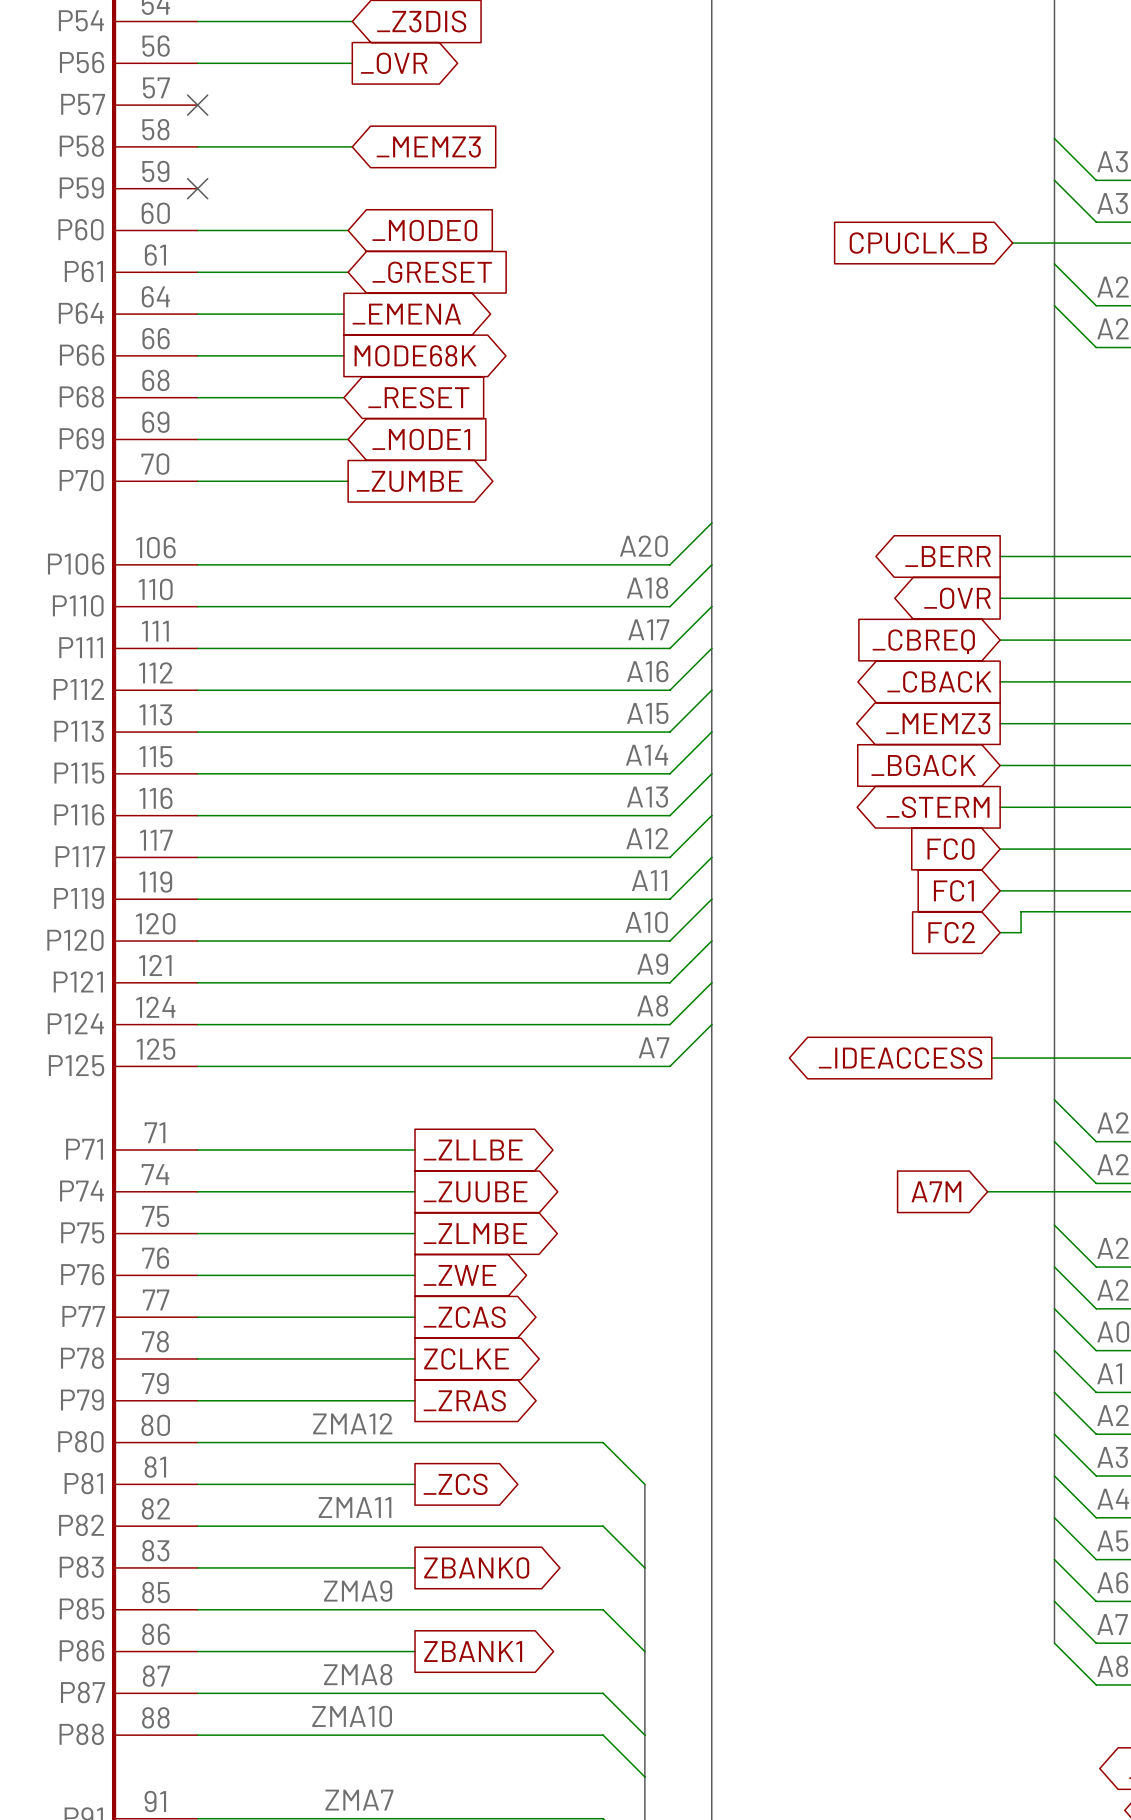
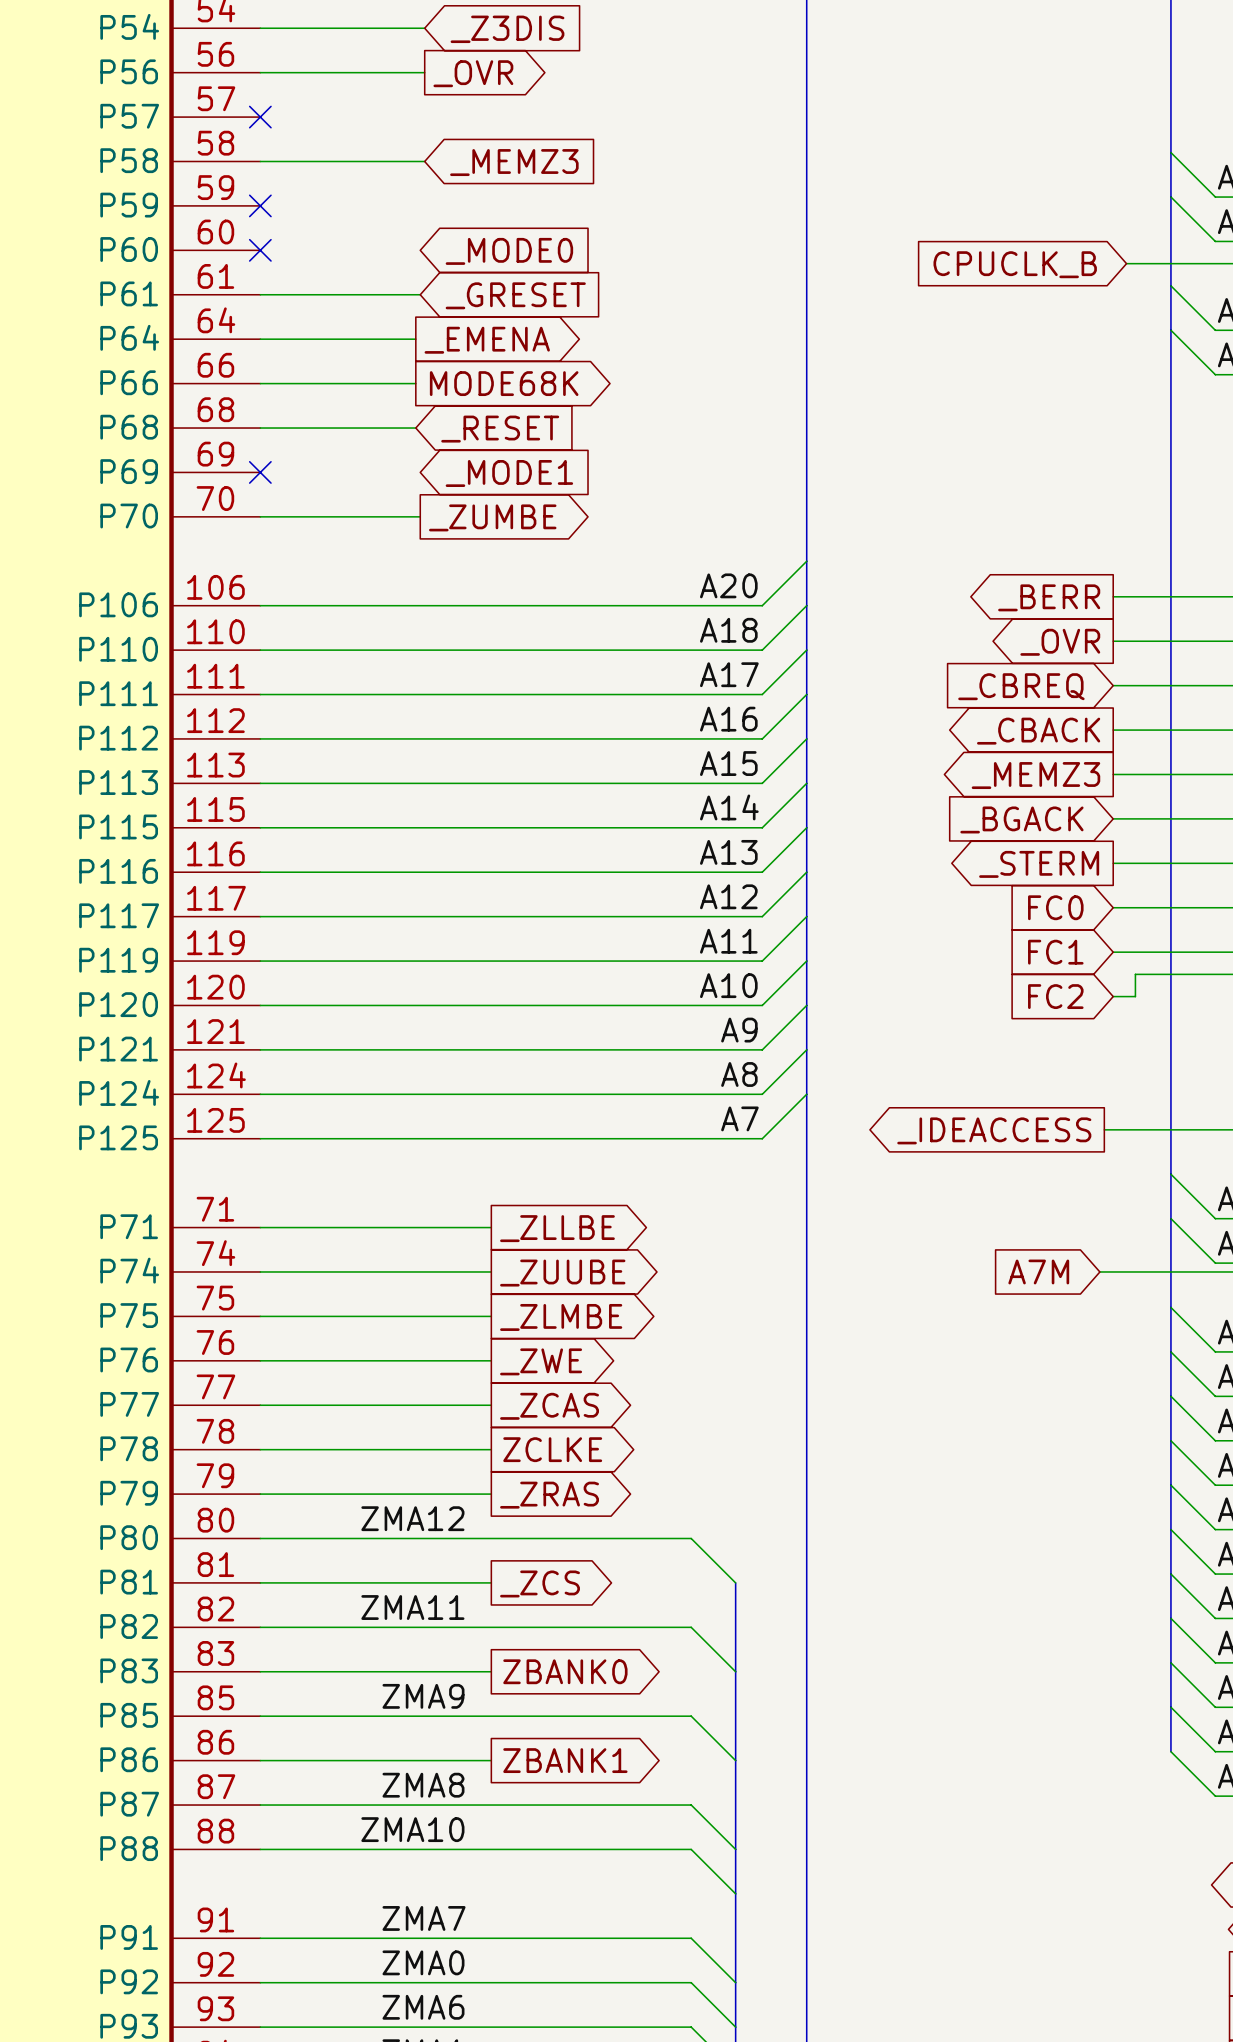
wire: (197, 230) (348, 230) -> none
no-connect mark: none -> (260, 250)
wire: (197, 439) (348, 439) -> none
no-connect mark: none -> (260, 472)

